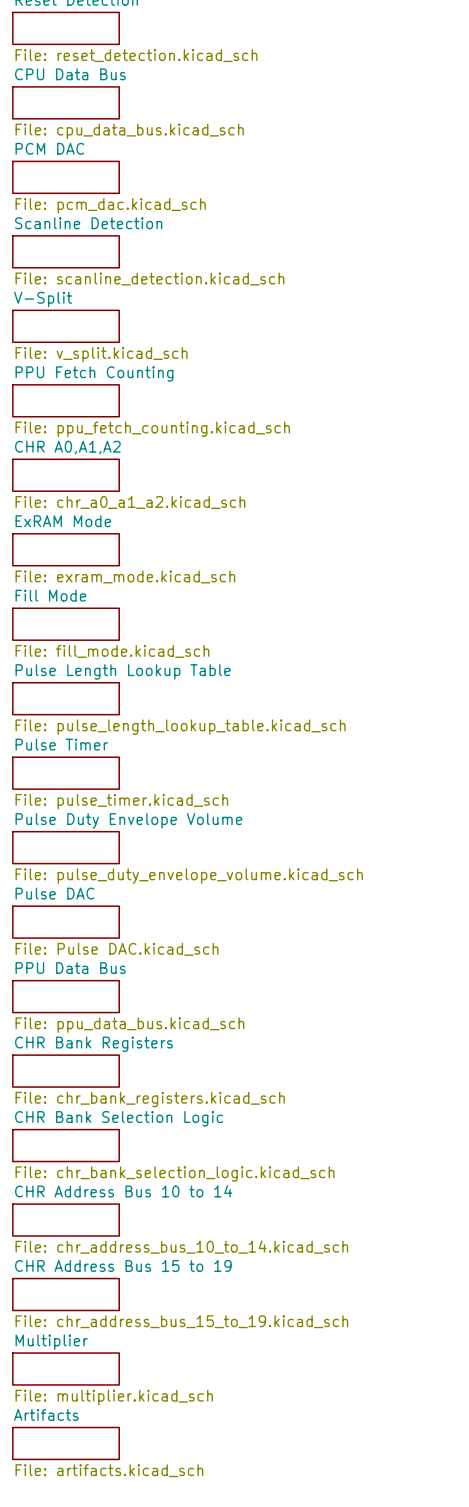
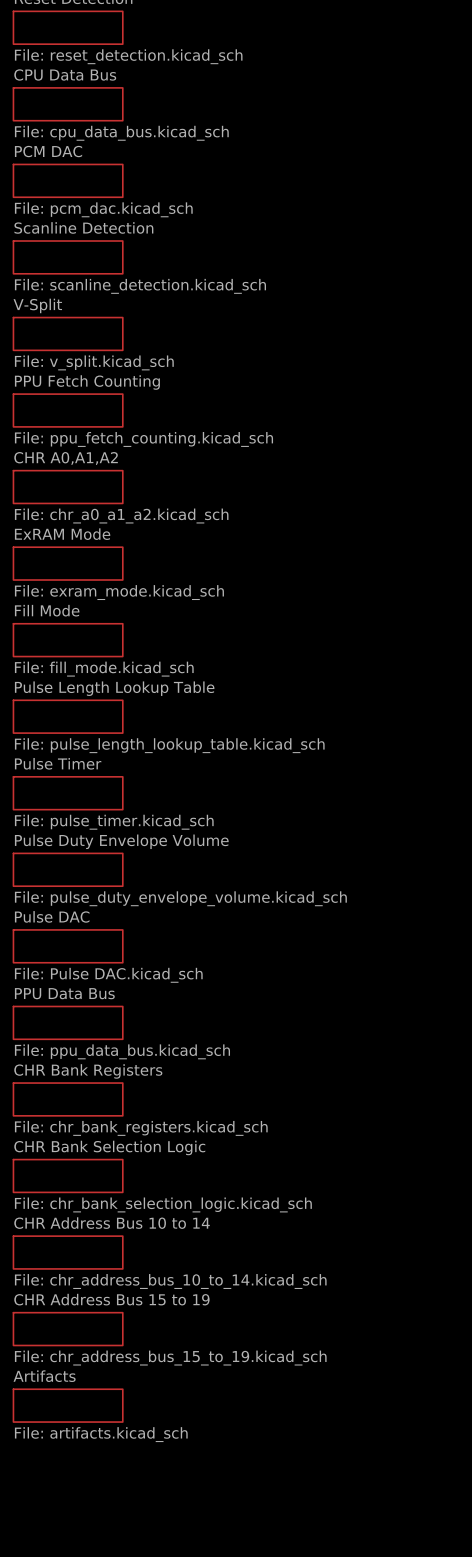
sheet Multiplier name: Multiplier (51, 1342) -> Artifacts (44, 1376)
sheet Multiplier value: File: multiplier.kicad_sch (114, 1397) -> File: artifacts.kicad_sch (101, 1434)
sheet Artifacts: File: artifacts.kicad_sch (66, 1443) -> none

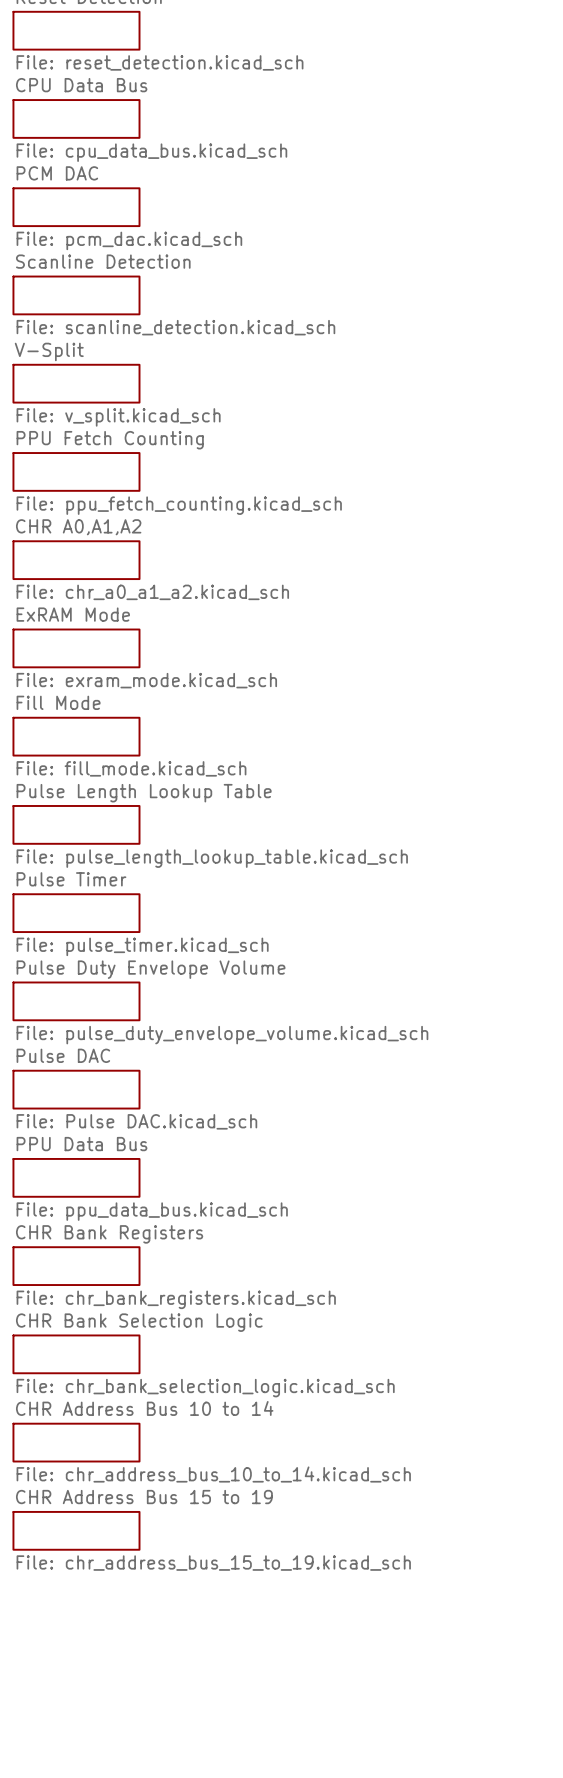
sheet Artifacts: File: artifacts.kicad_sch (68, 1405) -> none

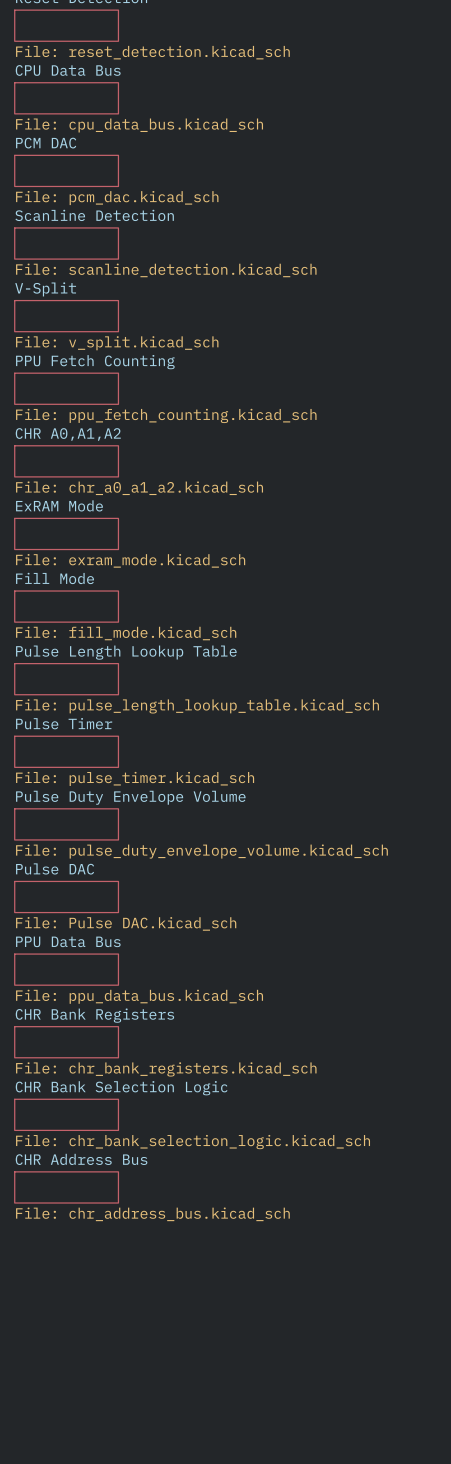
sheet CHR Address Bus 10 to 14 name: CHR Address Bus 10 to 14 (144, 1408) -> CHR Address Bus (81, 1159)
sheet CHR Address Bus 10 to 14 value: File: chr_address_bus_10_to_14.kicad_sch (213, 1474) -> File: chr_address_bus.kicad_sch (152, 1214)
sheet CHR Address Bus 15 to 19: File: chr_address_bus_15_to_19.kicad_sch (76, 1530) -> none

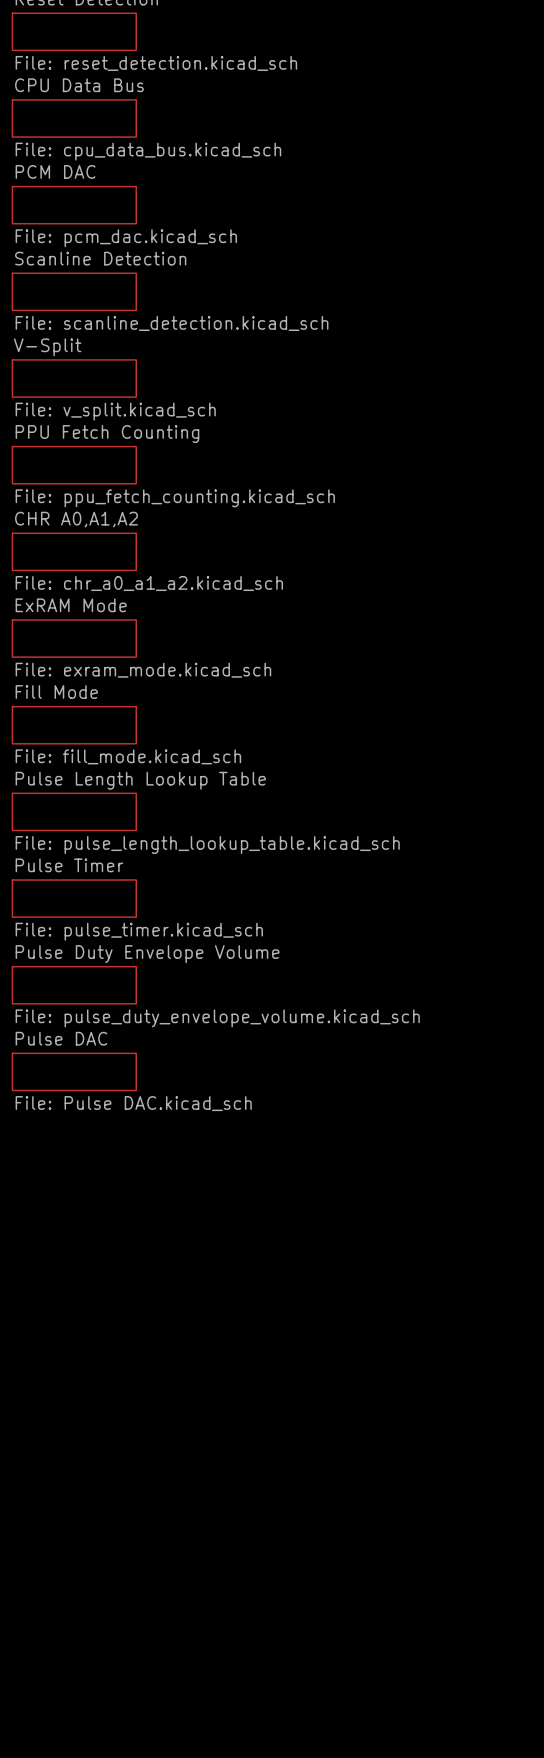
sheet PPU Data Bus: File: ppu_data_bus.kicad_sch (66, 969) -> none
sheet CHR Bank Registers: File: chr_bank_registers.kicad_sch (66, 1042) -> none
sheet CHR Bank Selection Logic: File: chr_bank_selection_logic.kicad_sch (66, 1114) -> none
sheet CHR Address Bus: File: chr_address_bus.kicad_sch (66, 1187) -> none

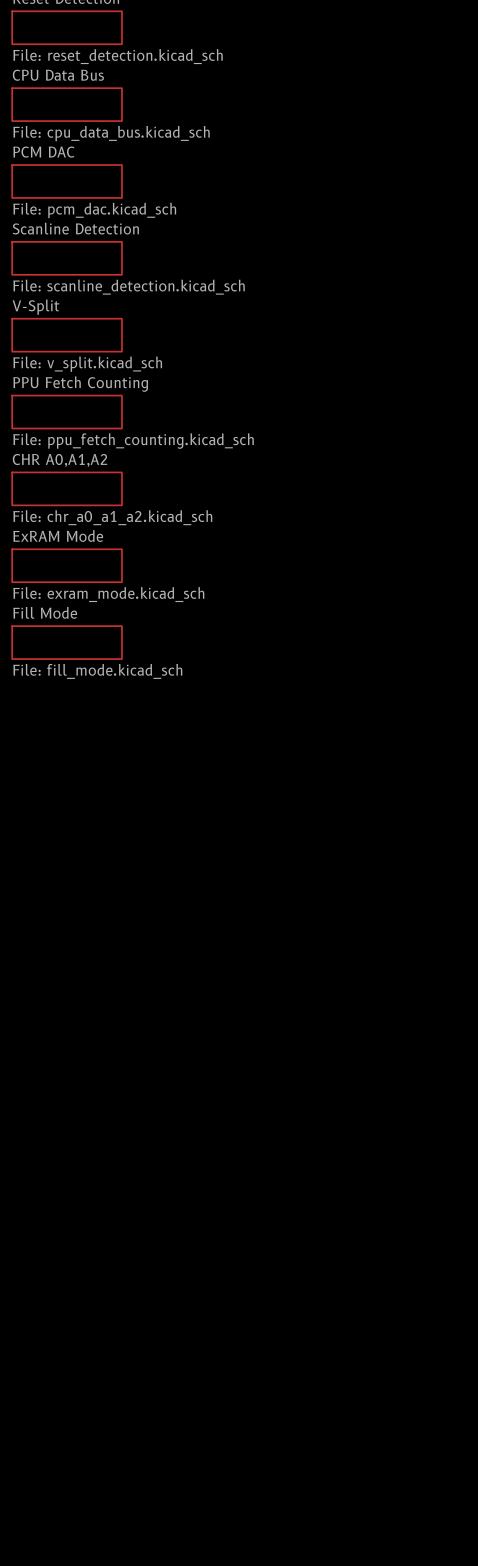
sheet Pulse Length Lookup Table: File: pulse_length_lookup_table.kicad_sch (74, 811) -> none
sheet Pulse Timer: File: pulse_timer.kicad_sch (74, 898) -> none
sheet Pulse Duty Envelope Volume: File: pulse_duty_envelope_volume.kicad_sch (74, 985) -> none
sheet Pulse DAC: File: Pulse DAC.kicad_sch (74, 1071) -> none

